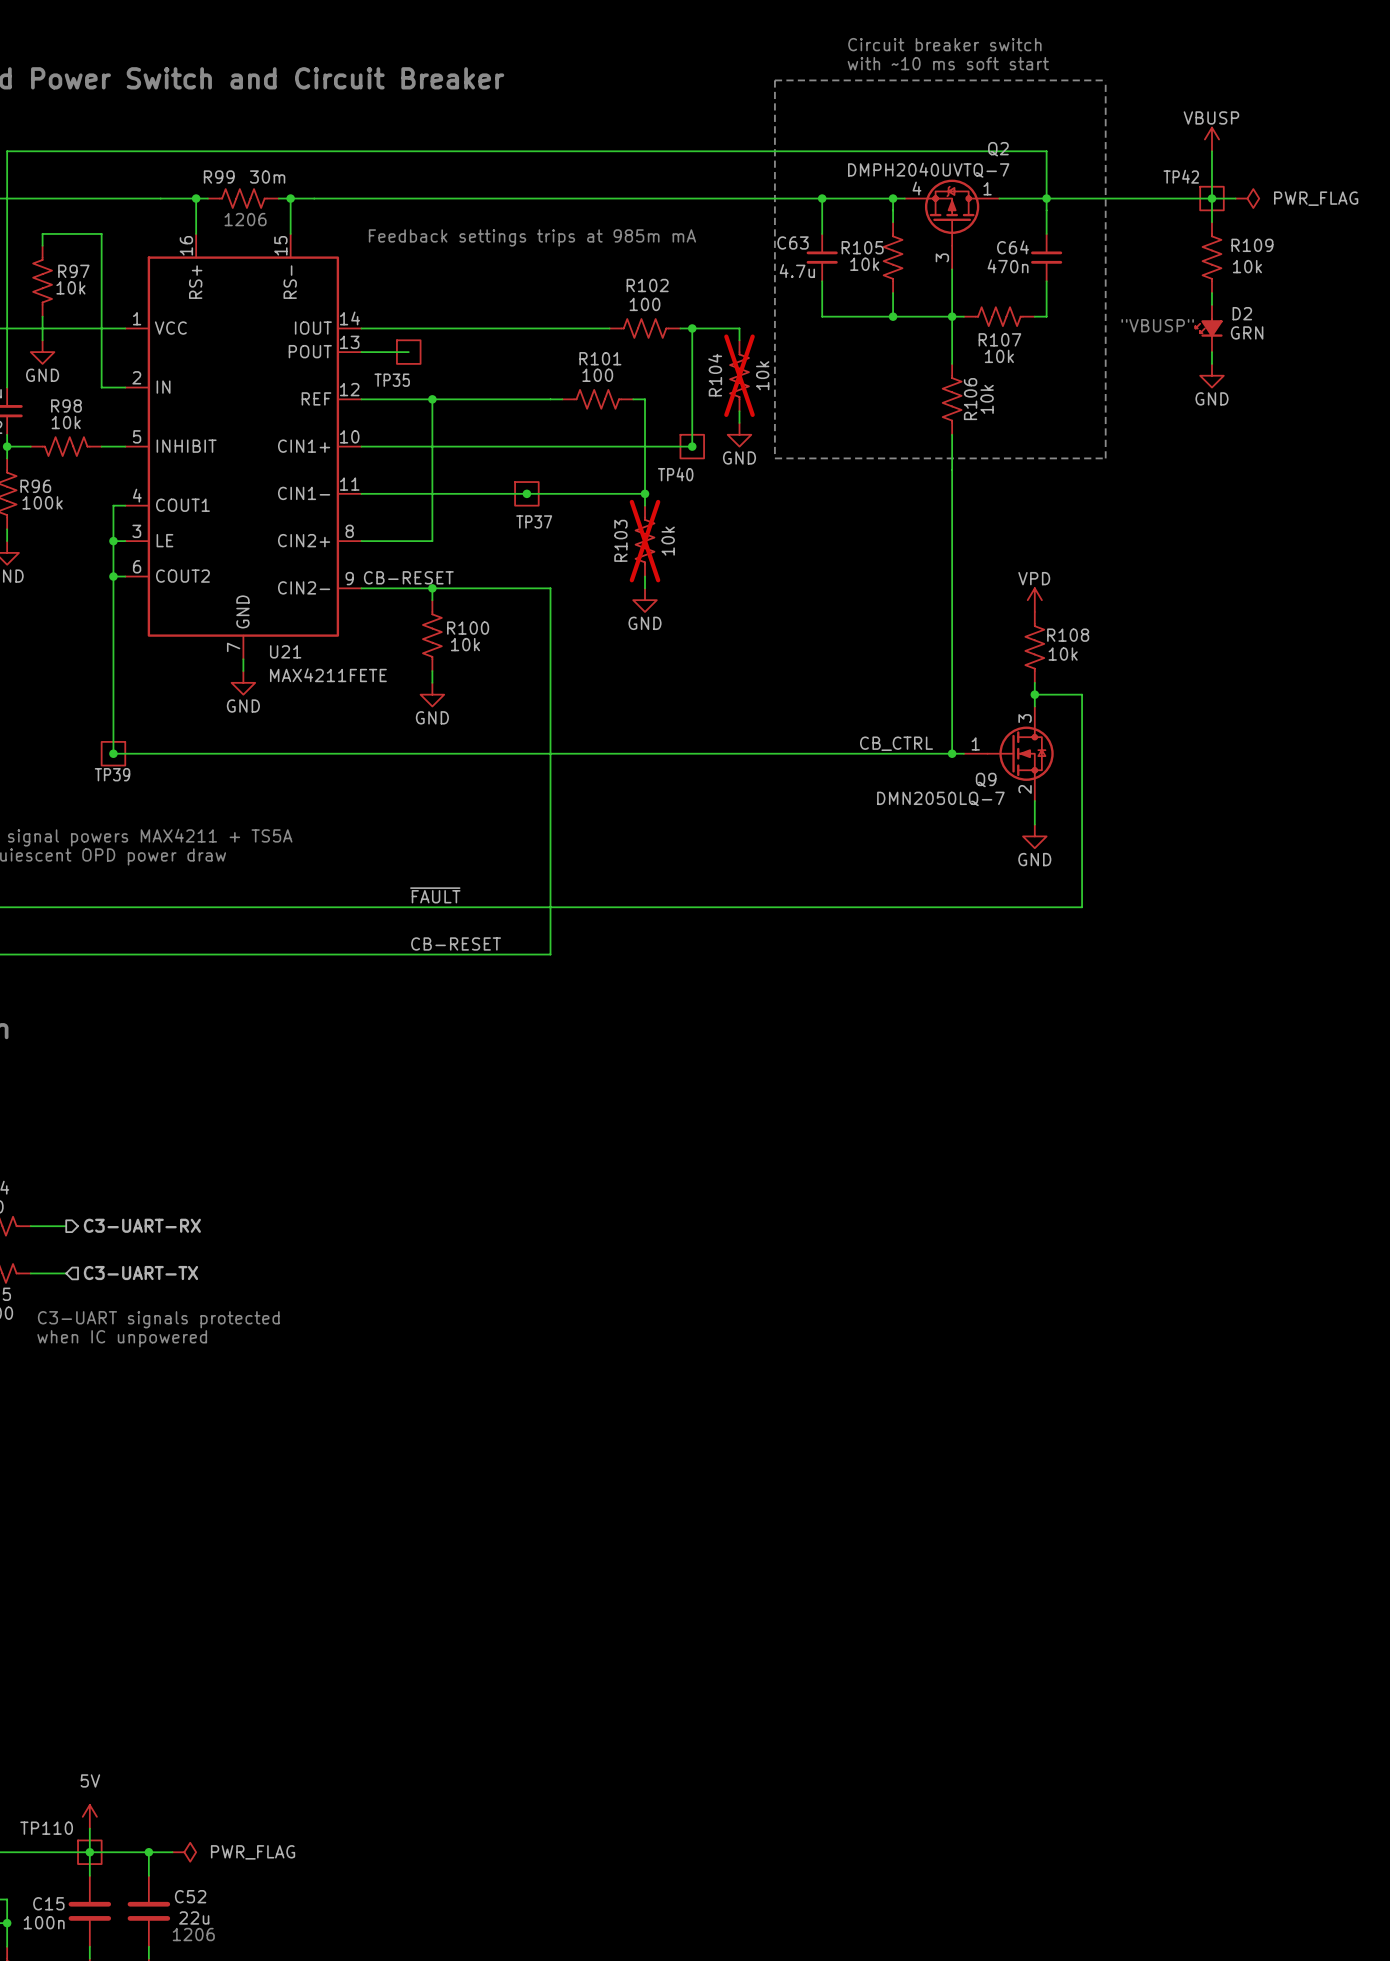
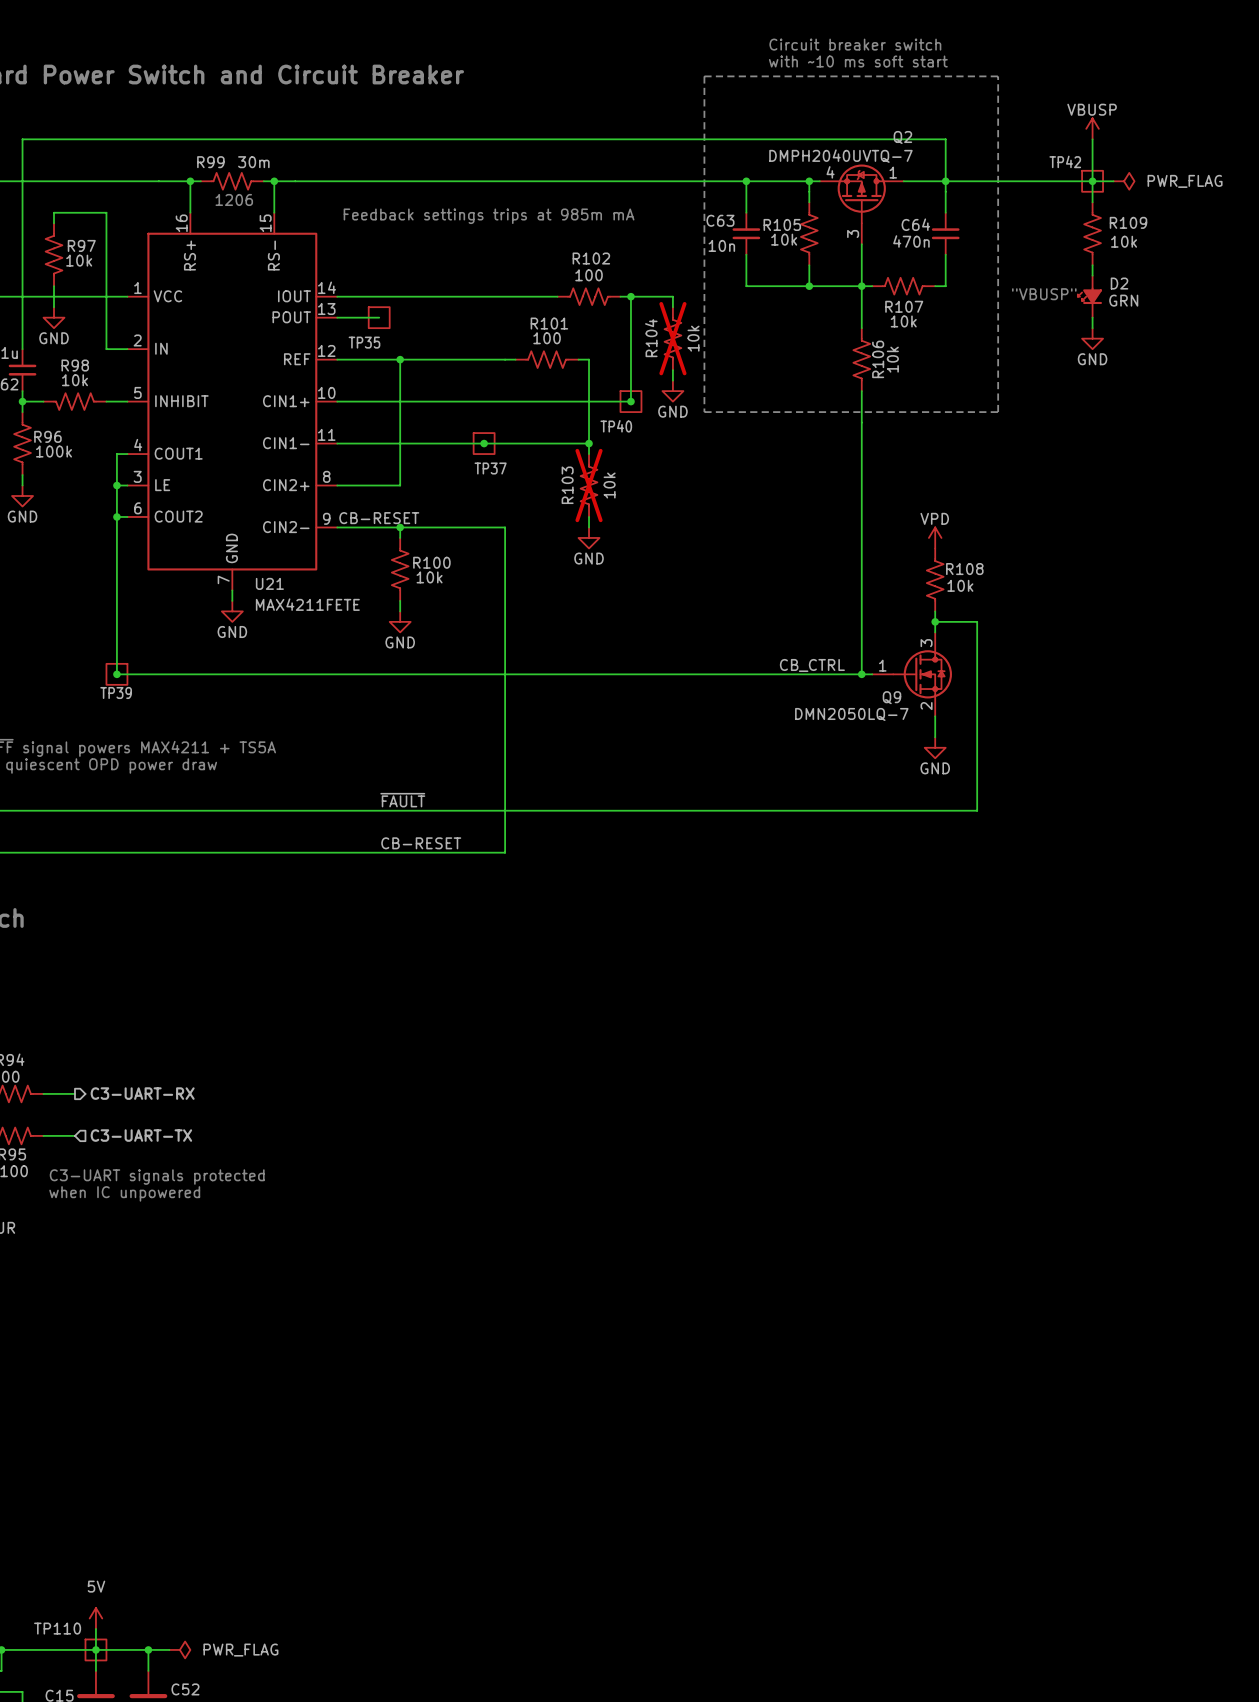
C63 value: 4.7u (797, 271) -> 10n (721, 245)

